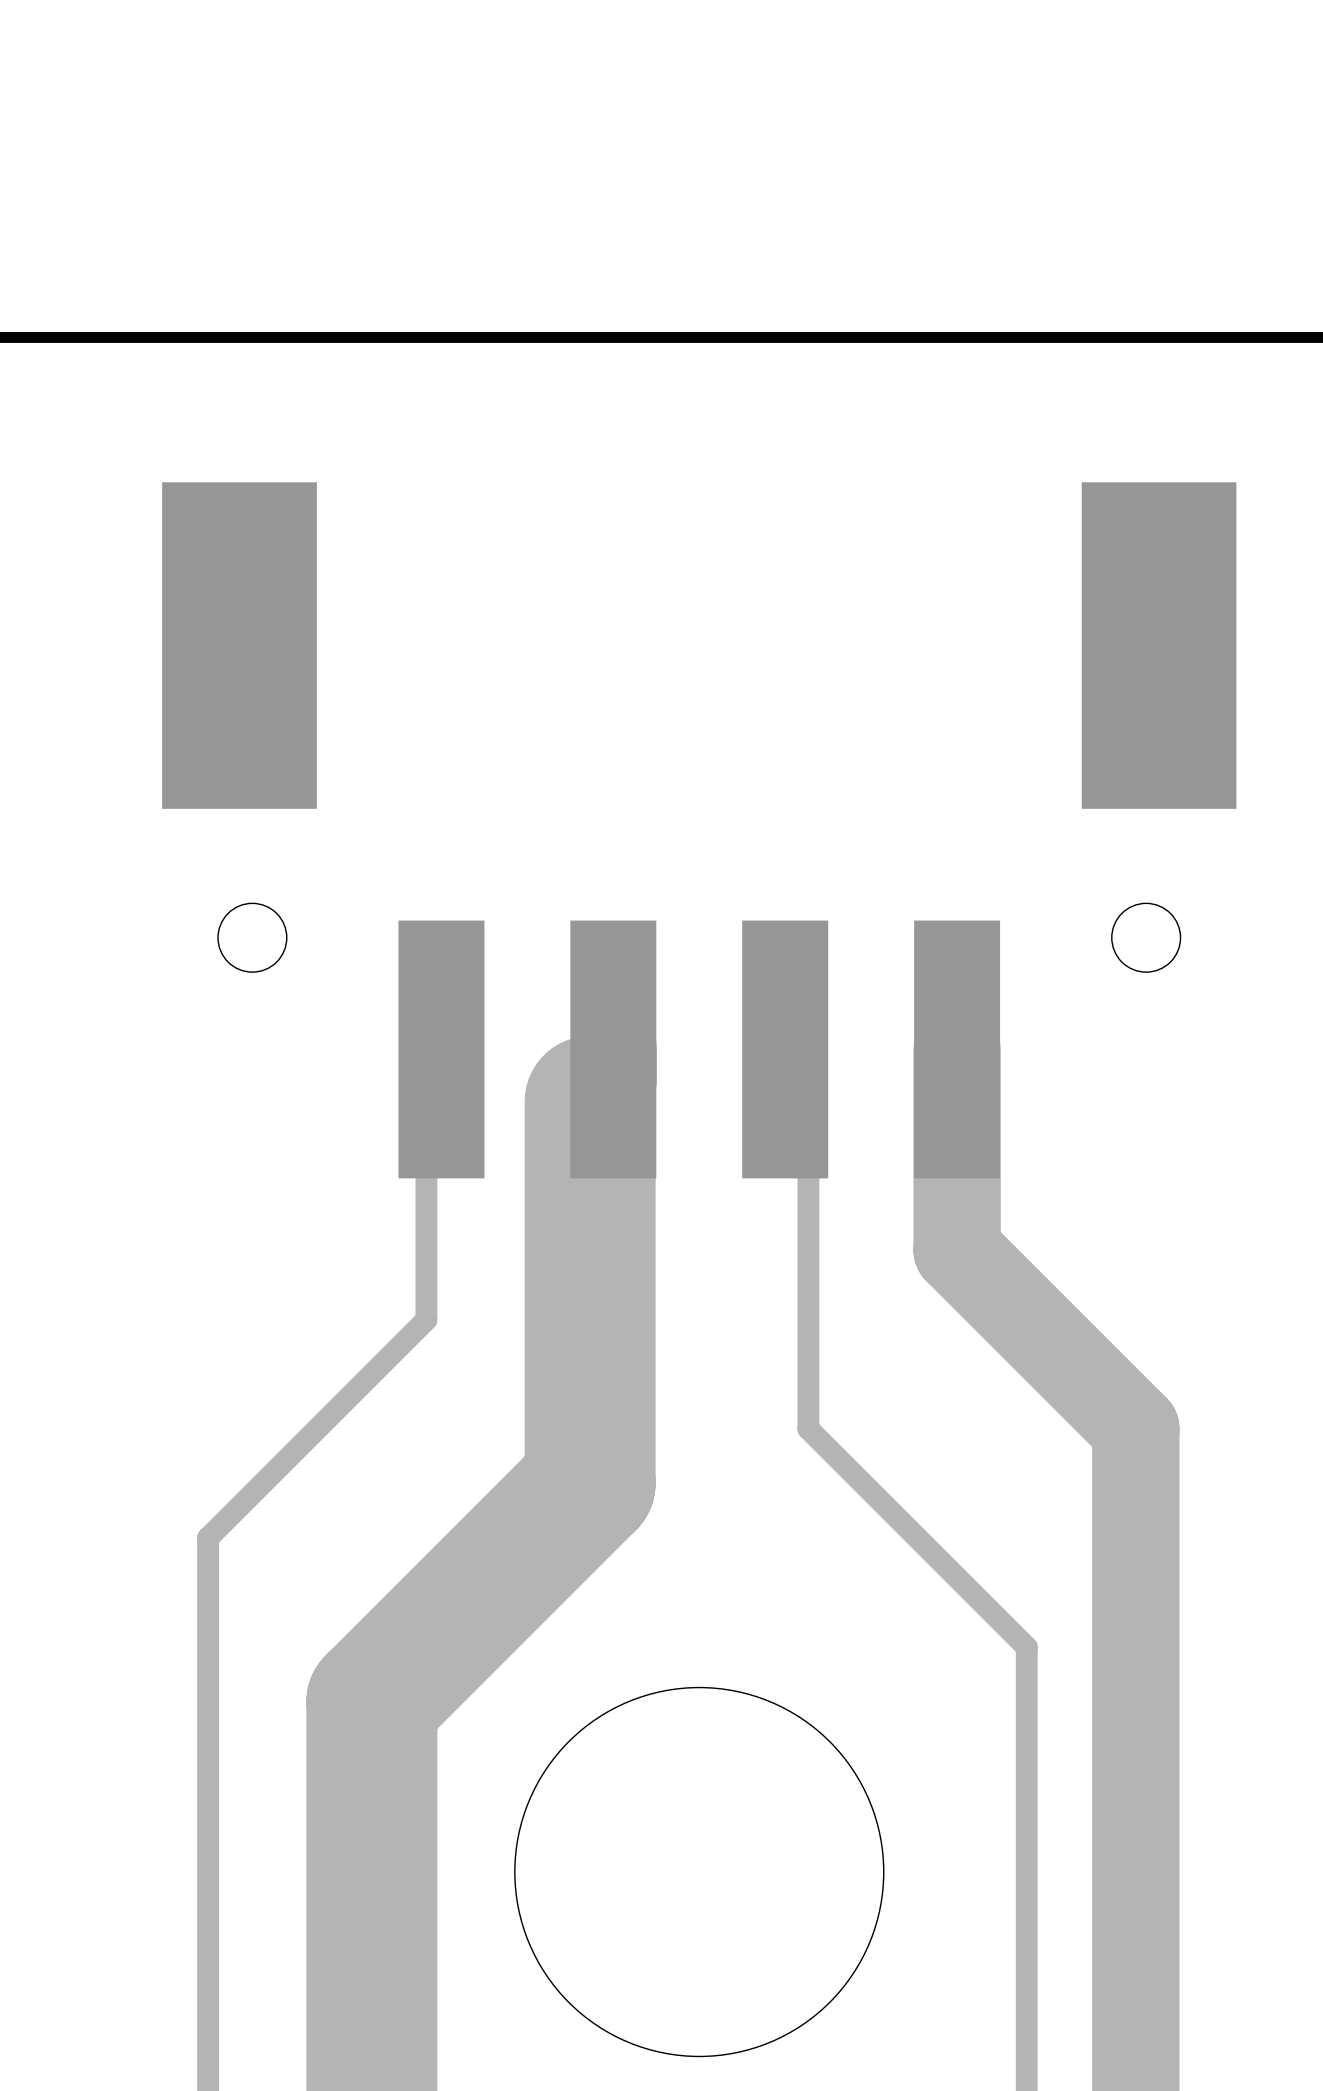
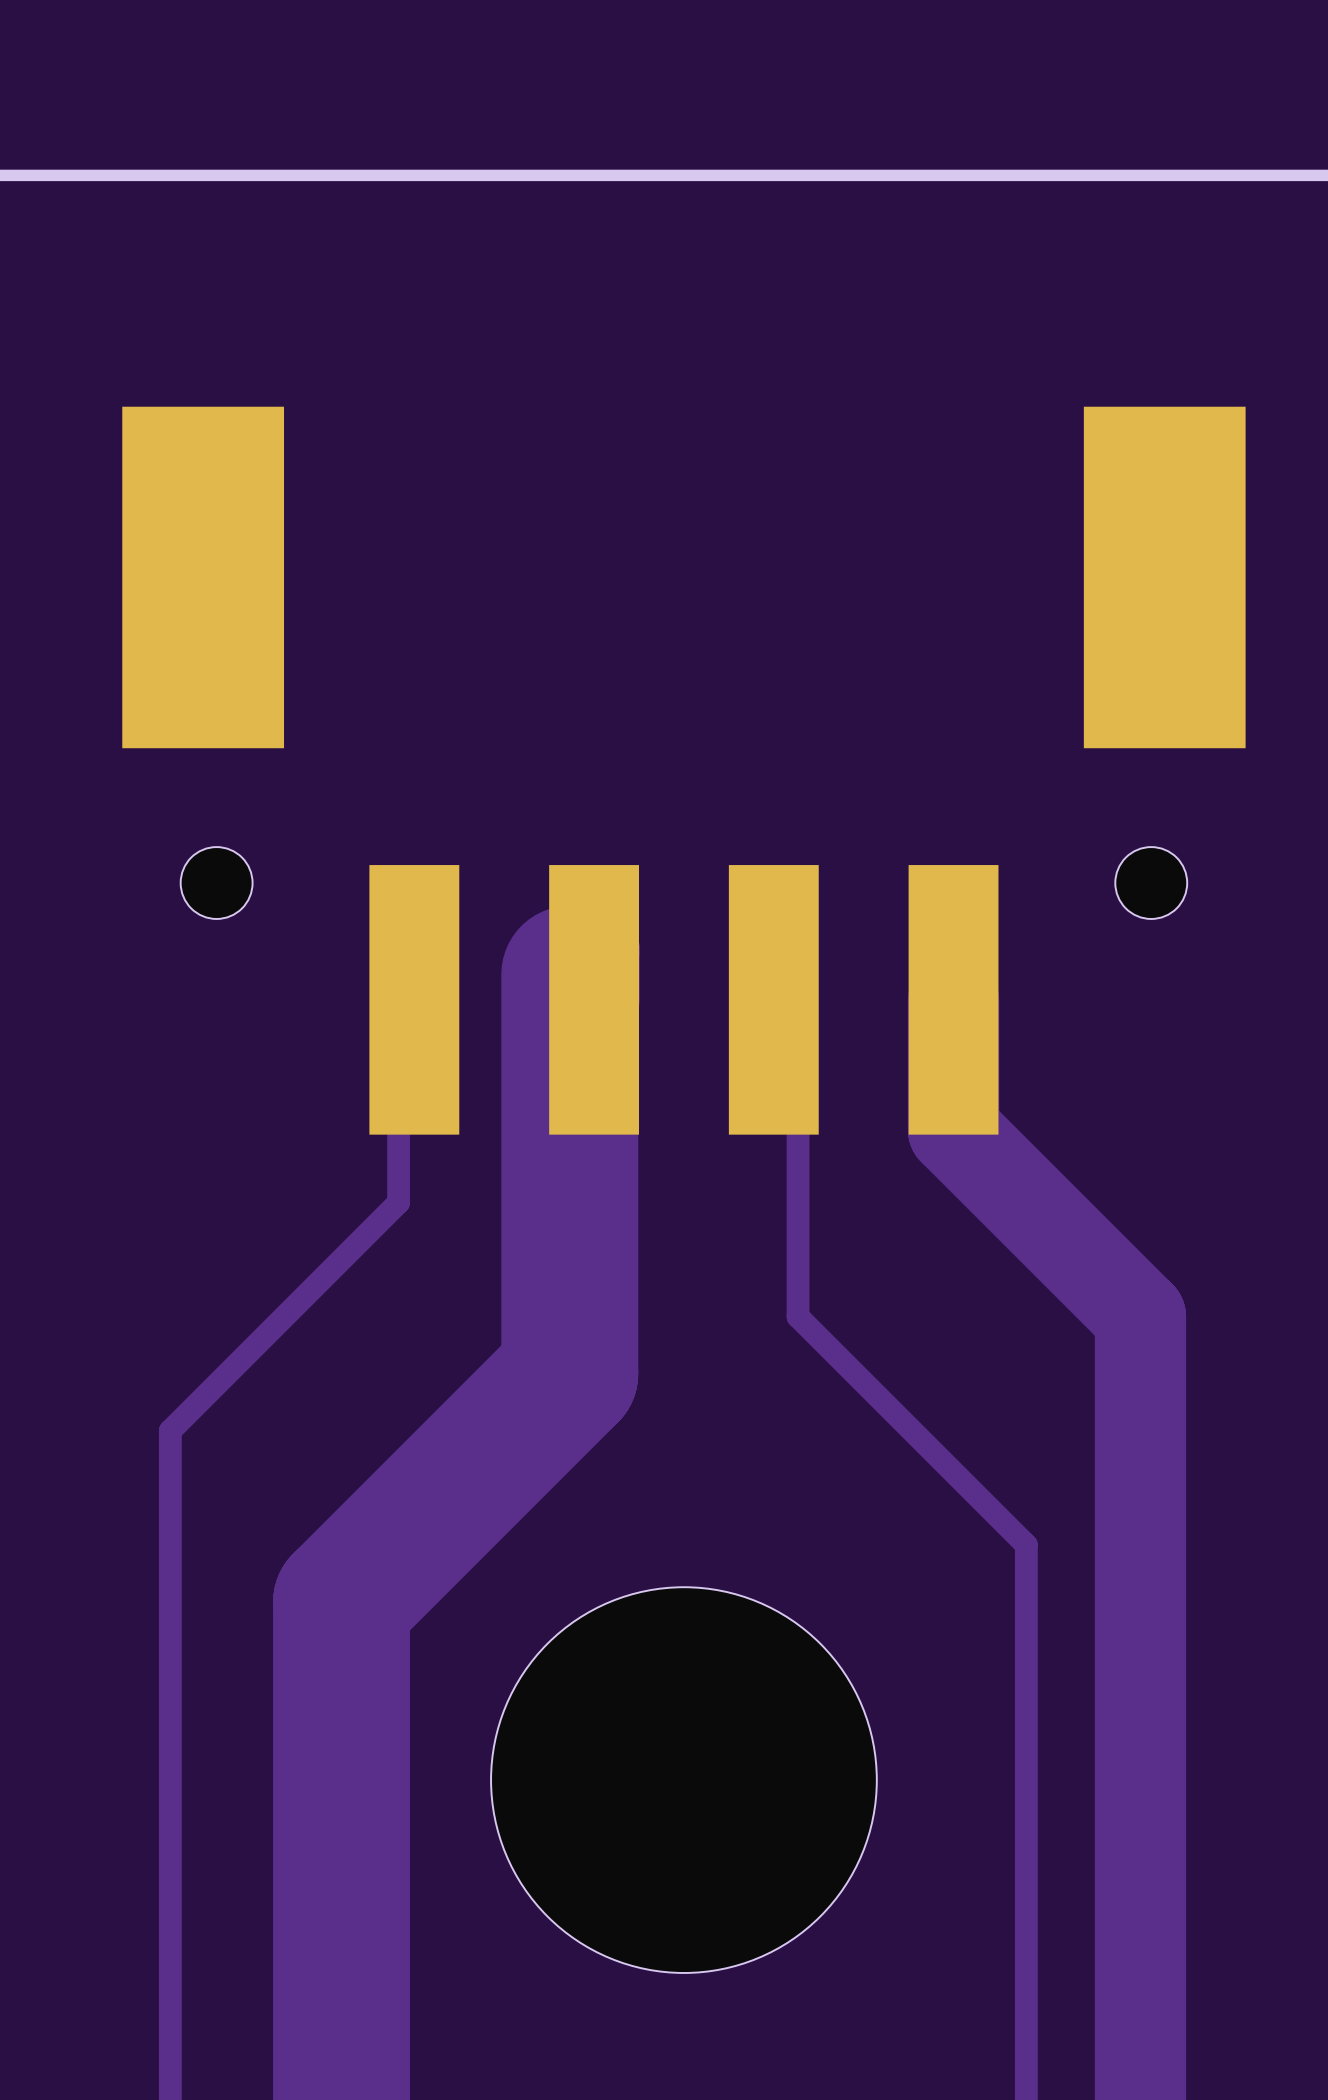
part position: (699, 830) -> (683, 770)

